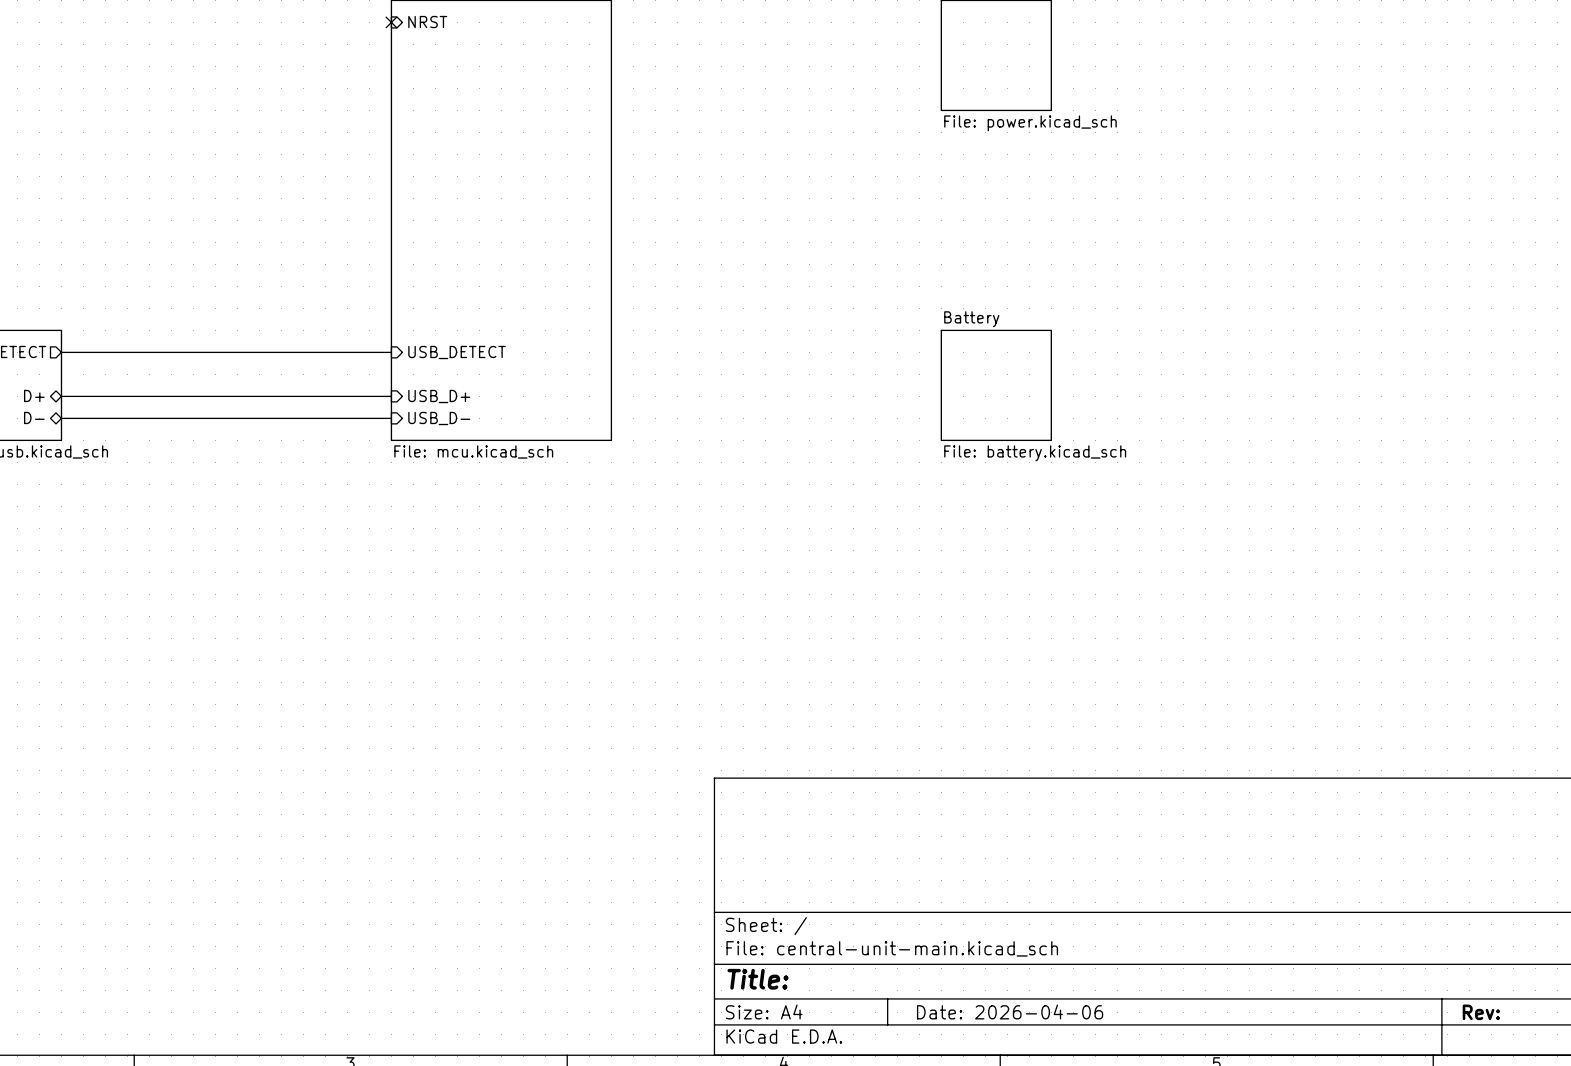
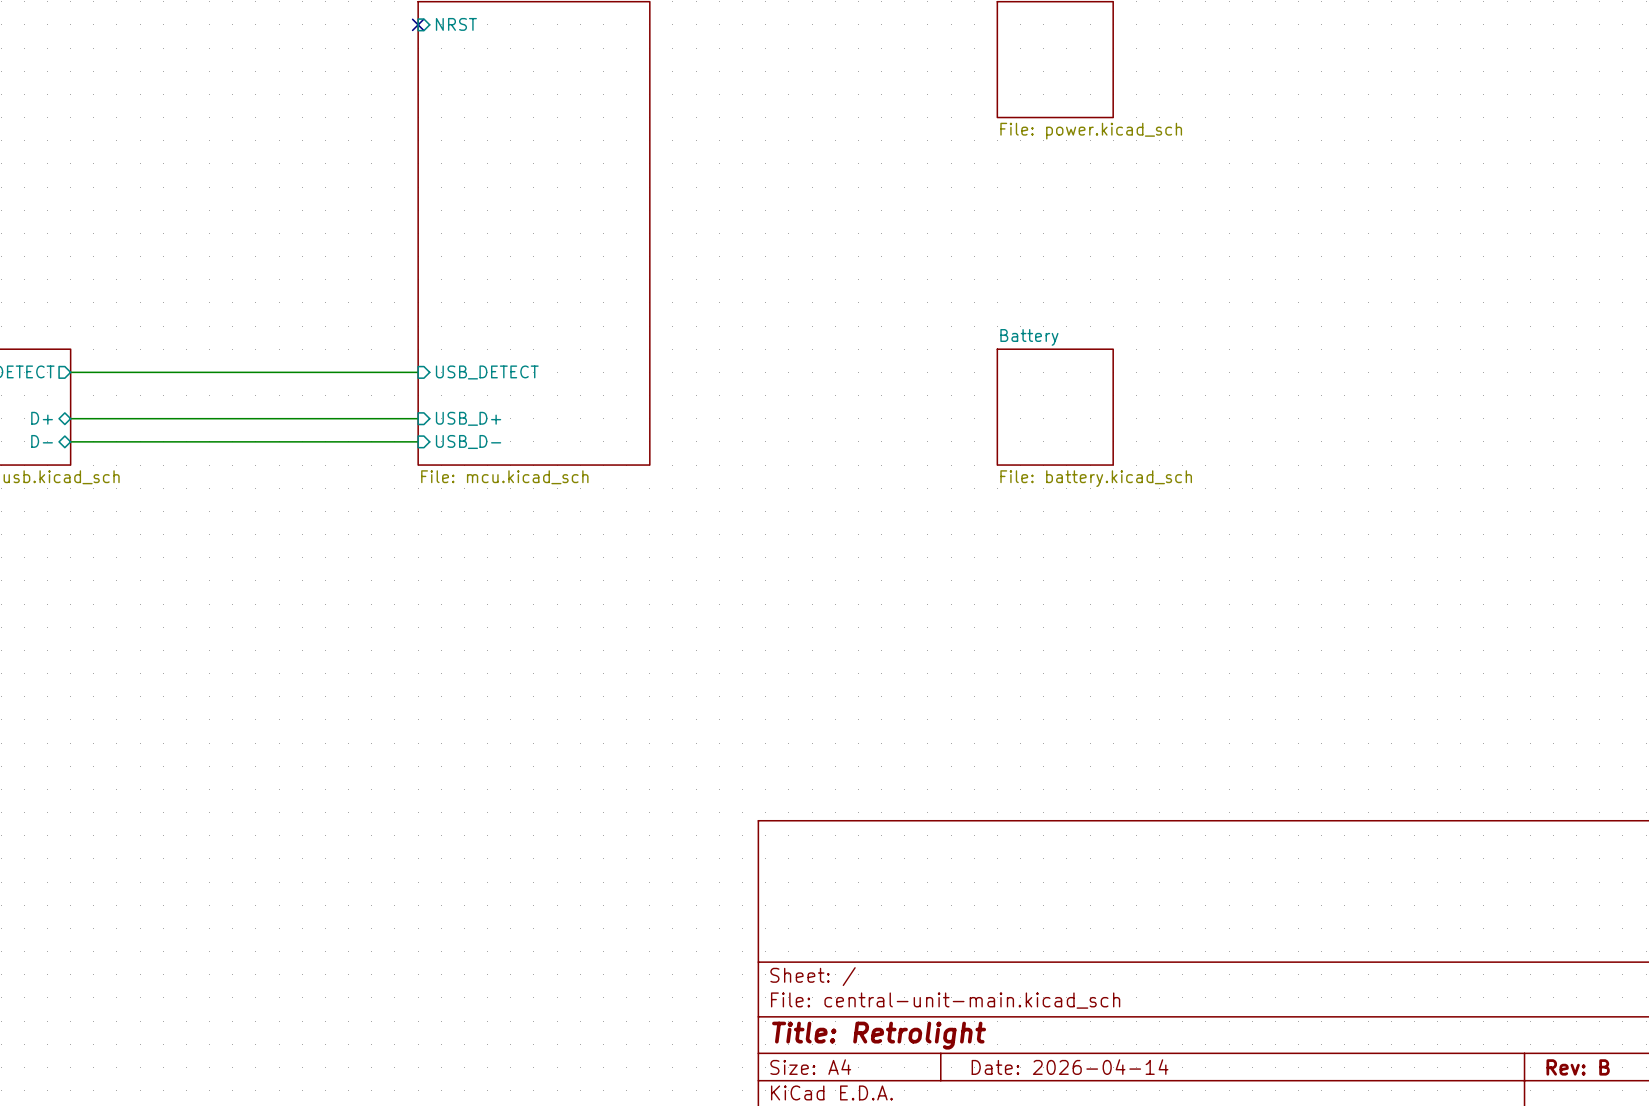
title block: Title: (758, 979) -> Title: Retrolight (879, 1035)
title block: Date: 2026-04-06 (1010, 1012) -> Date: 2026-04-14 (1070, 1067)
title block: Rev: (1481, 1012) -> Rev: B (1578, 1067)

